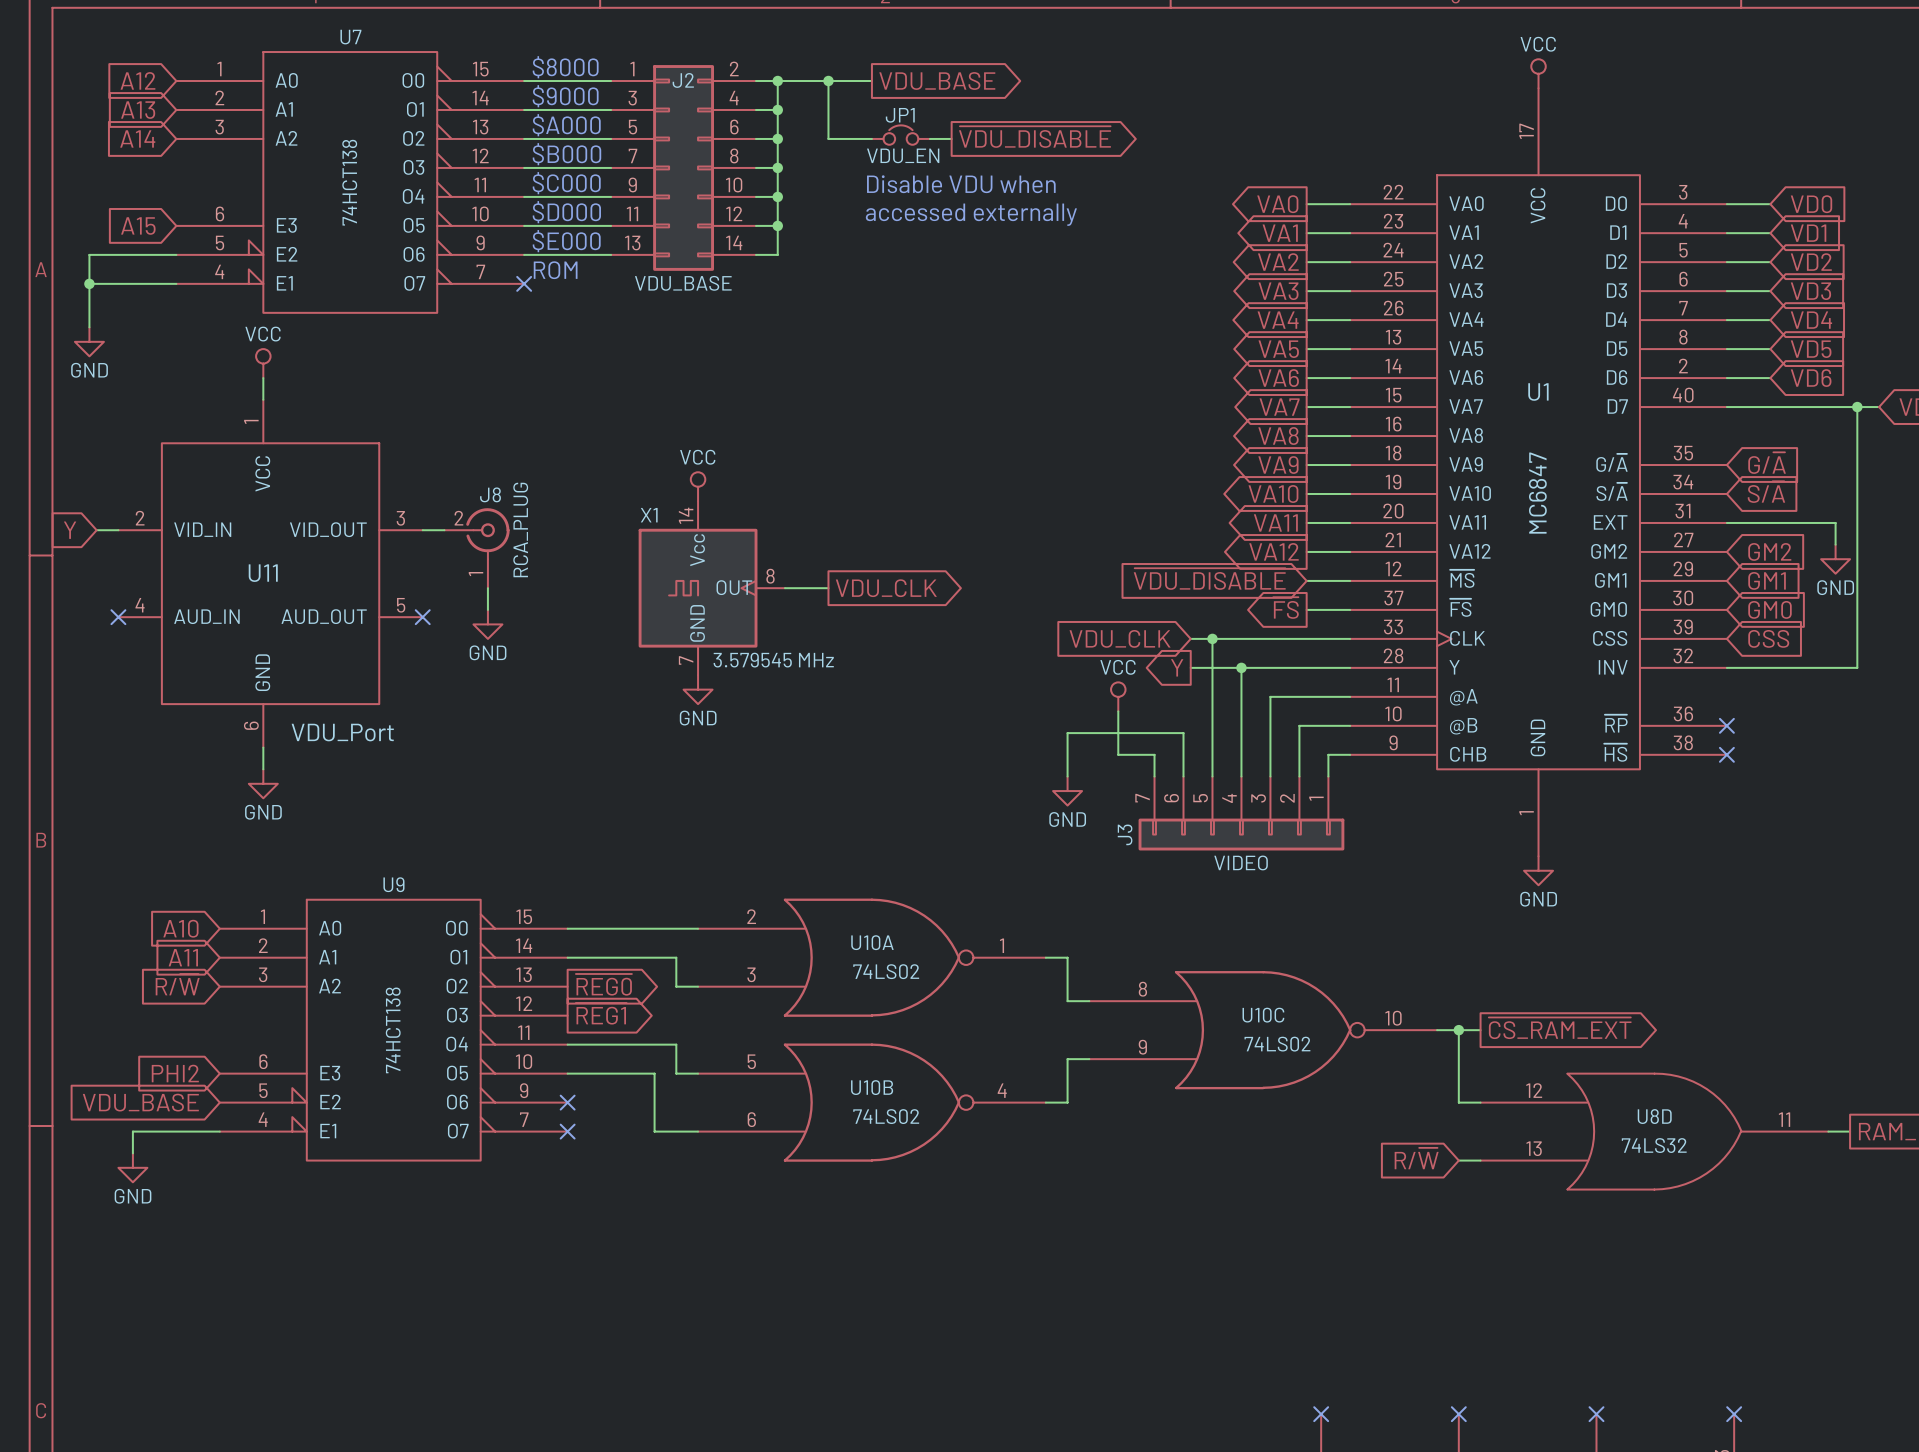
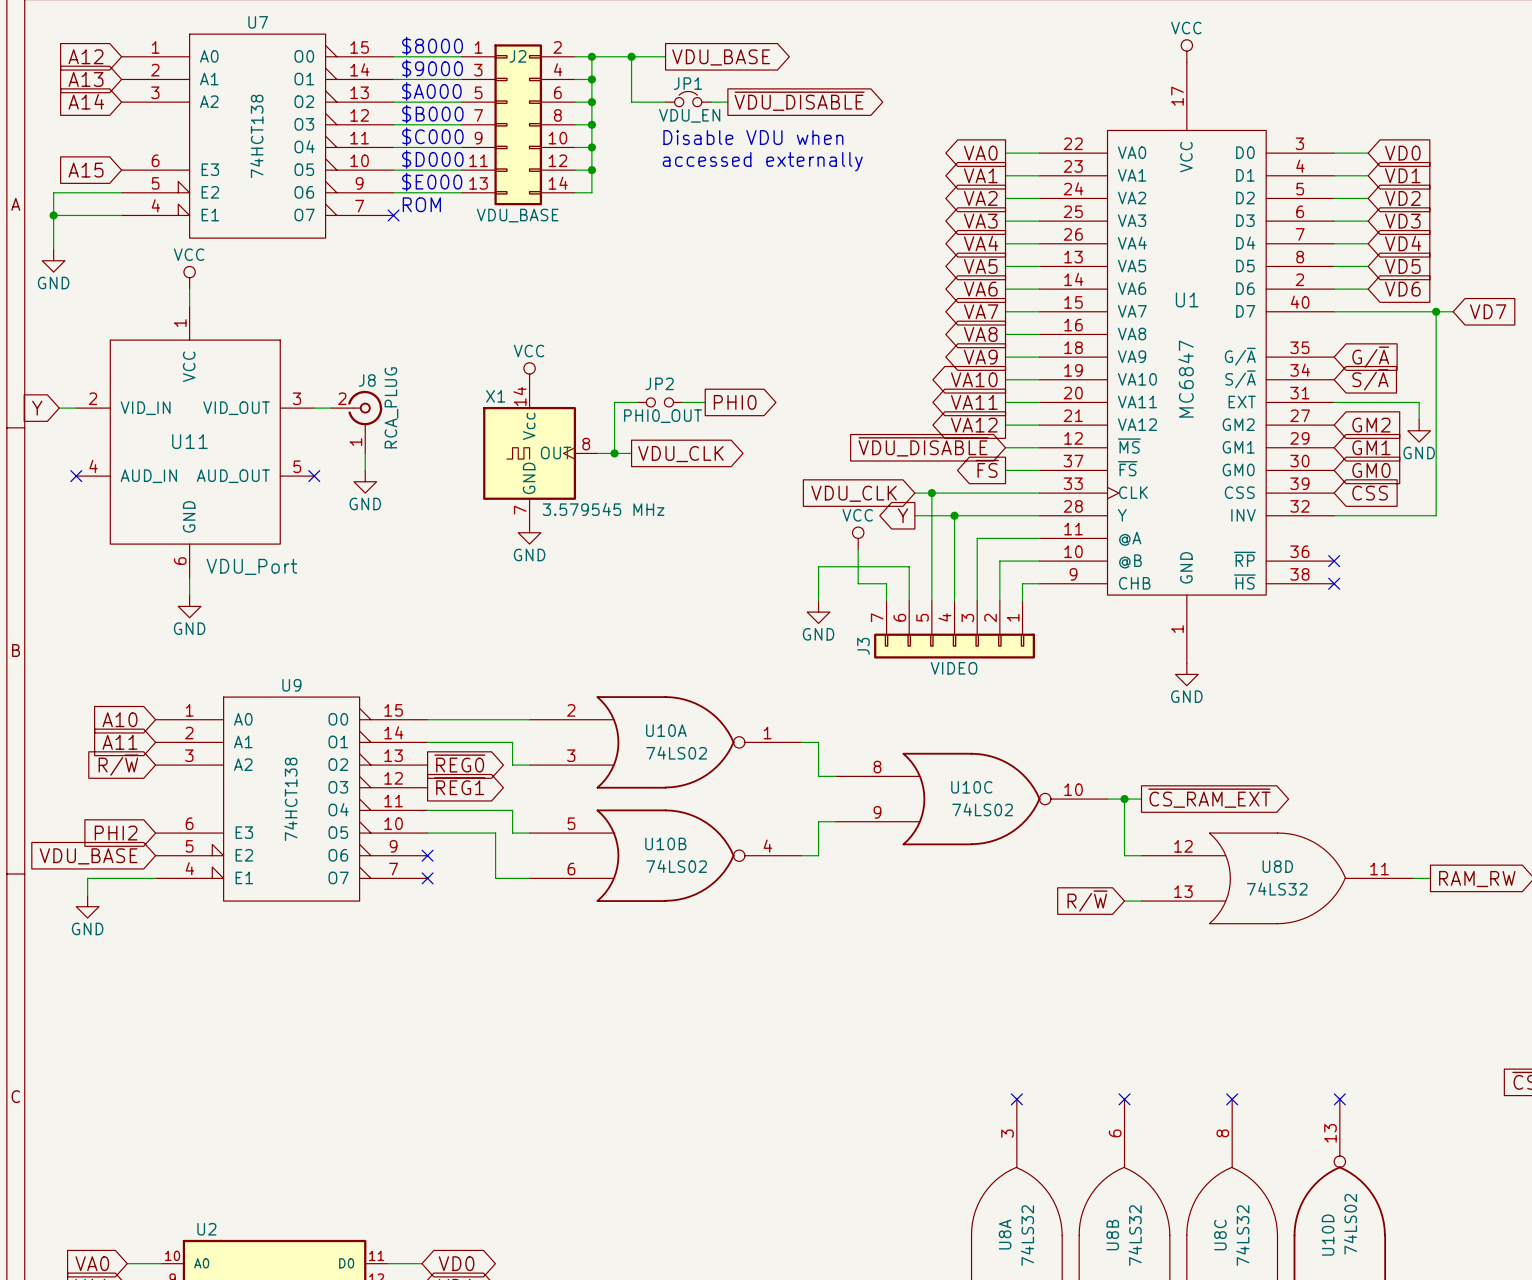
wire: none -> (637, 402) (614, 402) (614, 453)
JP2: none -> PHI0_OUT (659, 402)
wire: none -> (682, 402) (705, 402)
global label: none -> PHI0 (735, 402)
junction: none -> (614, 453)

